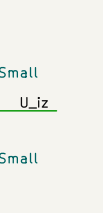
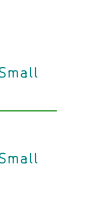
label: U_iz (34, 102) -> none

